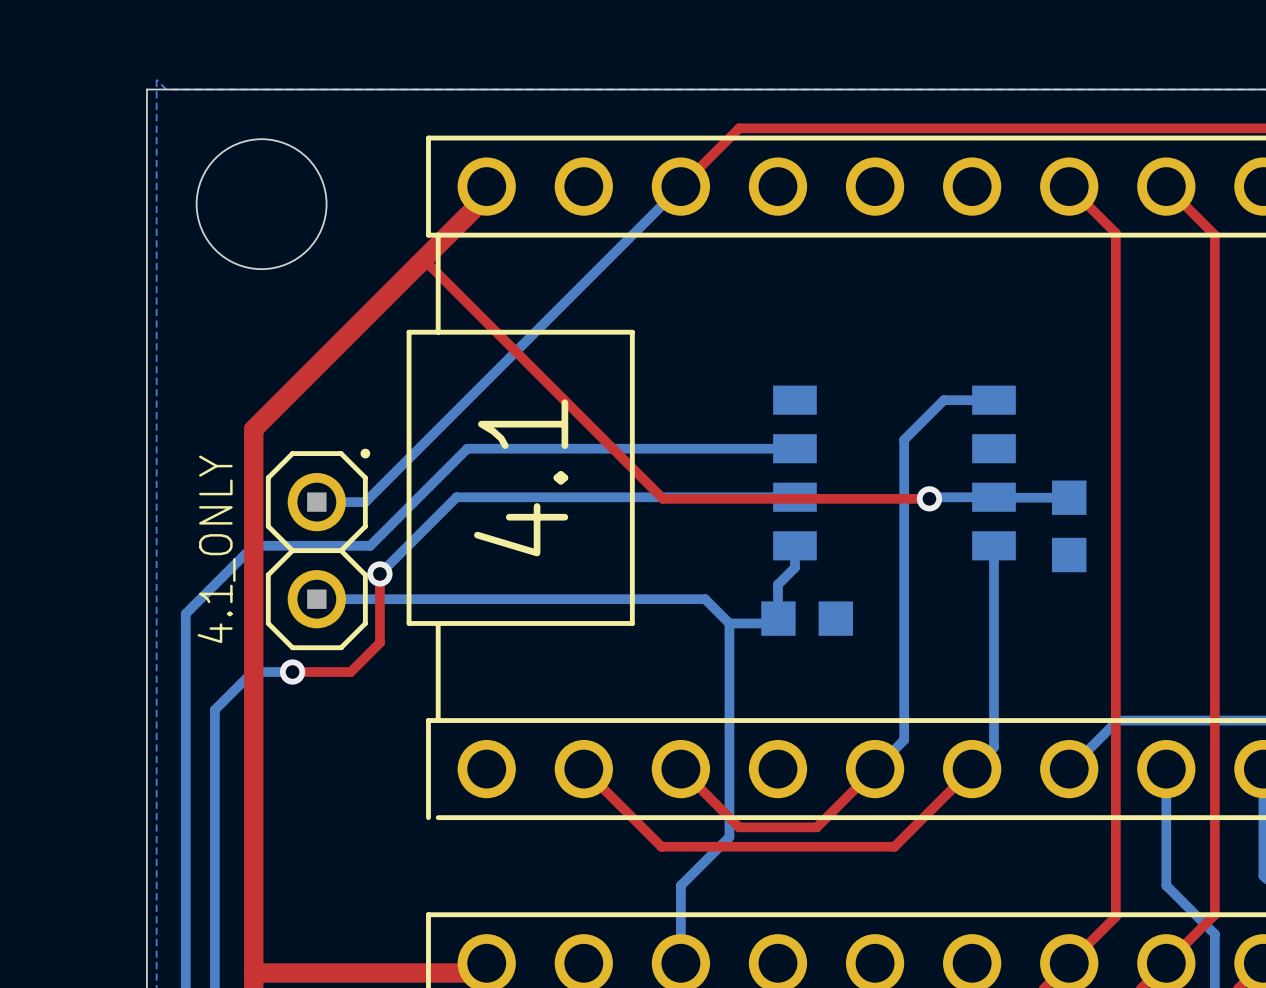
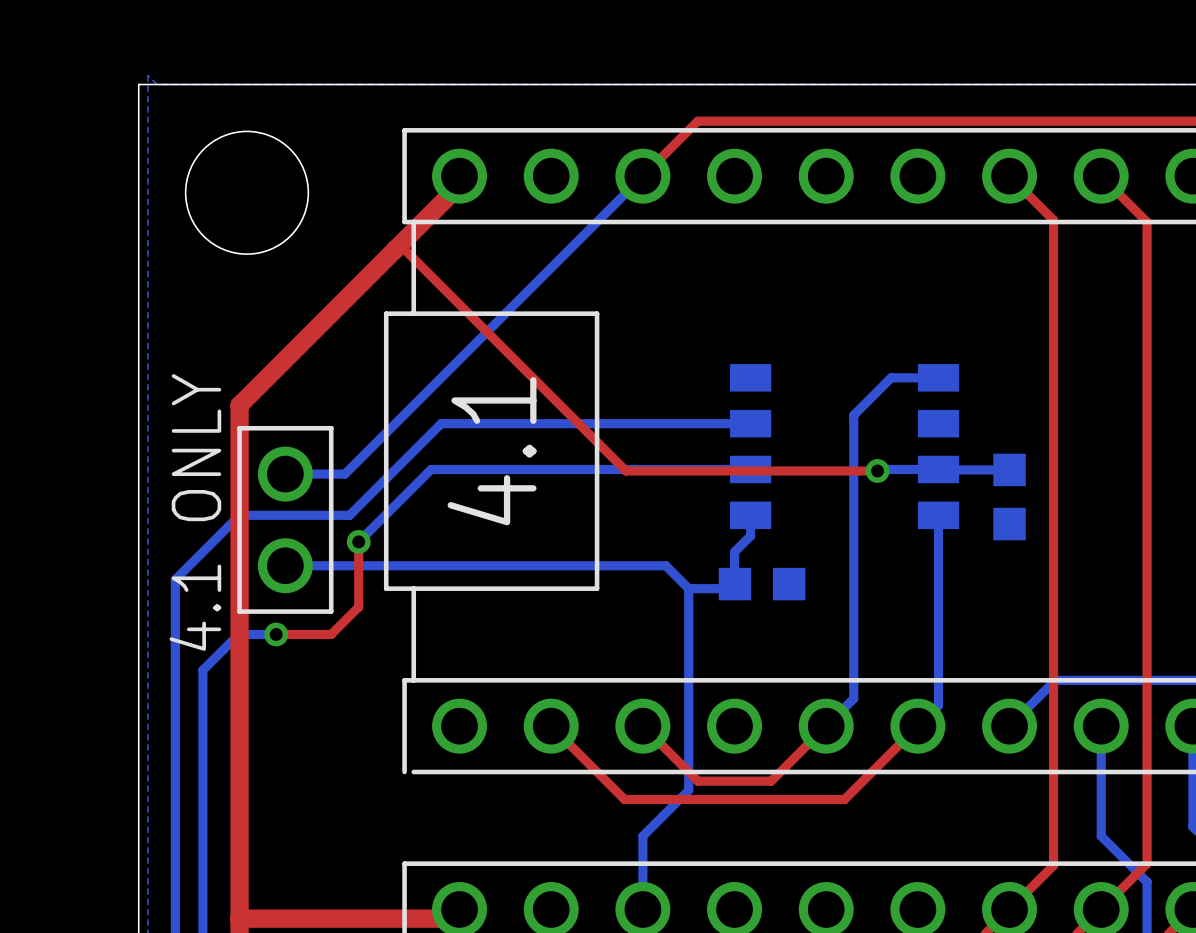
text: none -> 4.1 ONLY (195, 512)
4.1_ONLY: (318, 549) -> none
part: none -> (285, 519)

